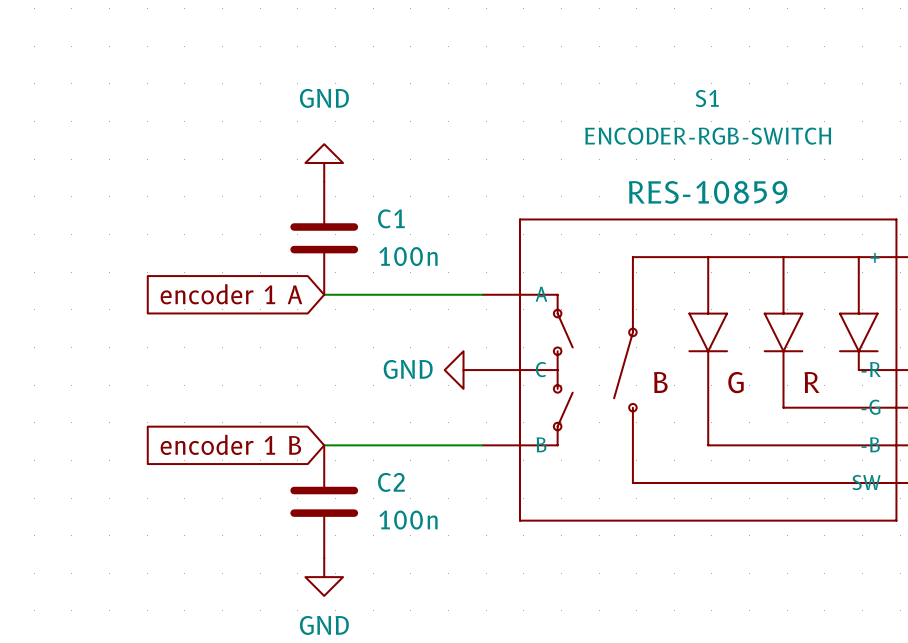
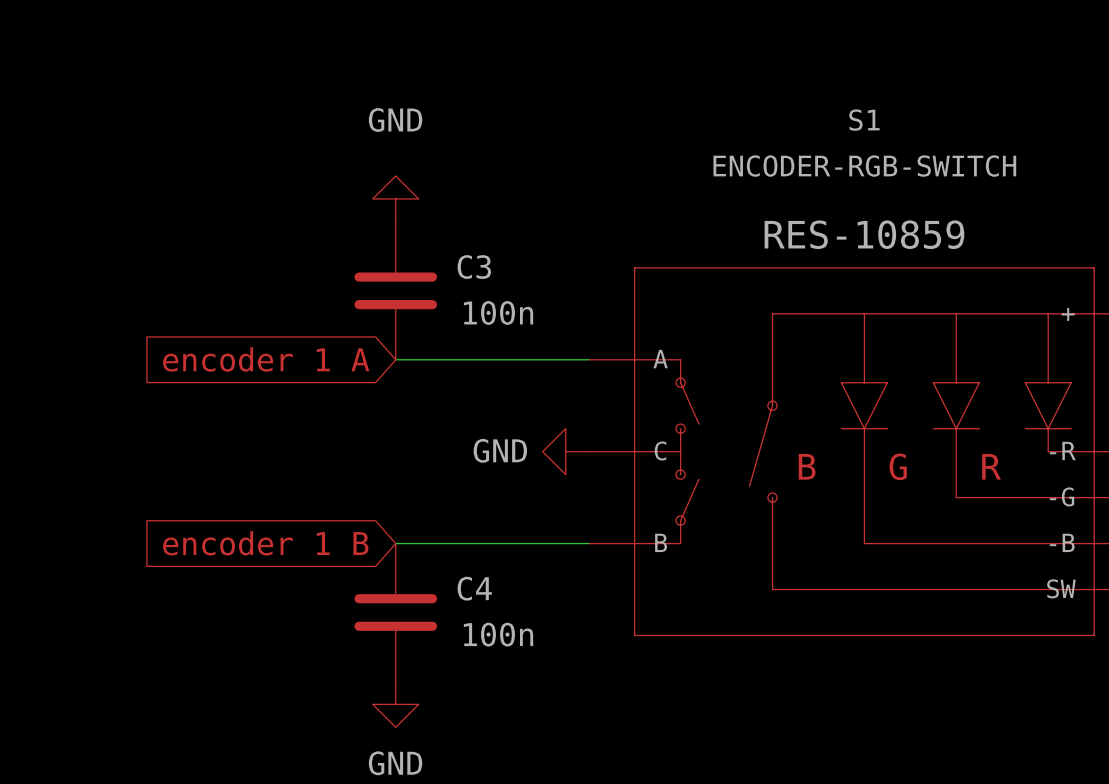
C1 name: C1 (391, 218) -> C3 (474, 267)
C2 name: C2 (391, 482) -> C4 (474, 588)

